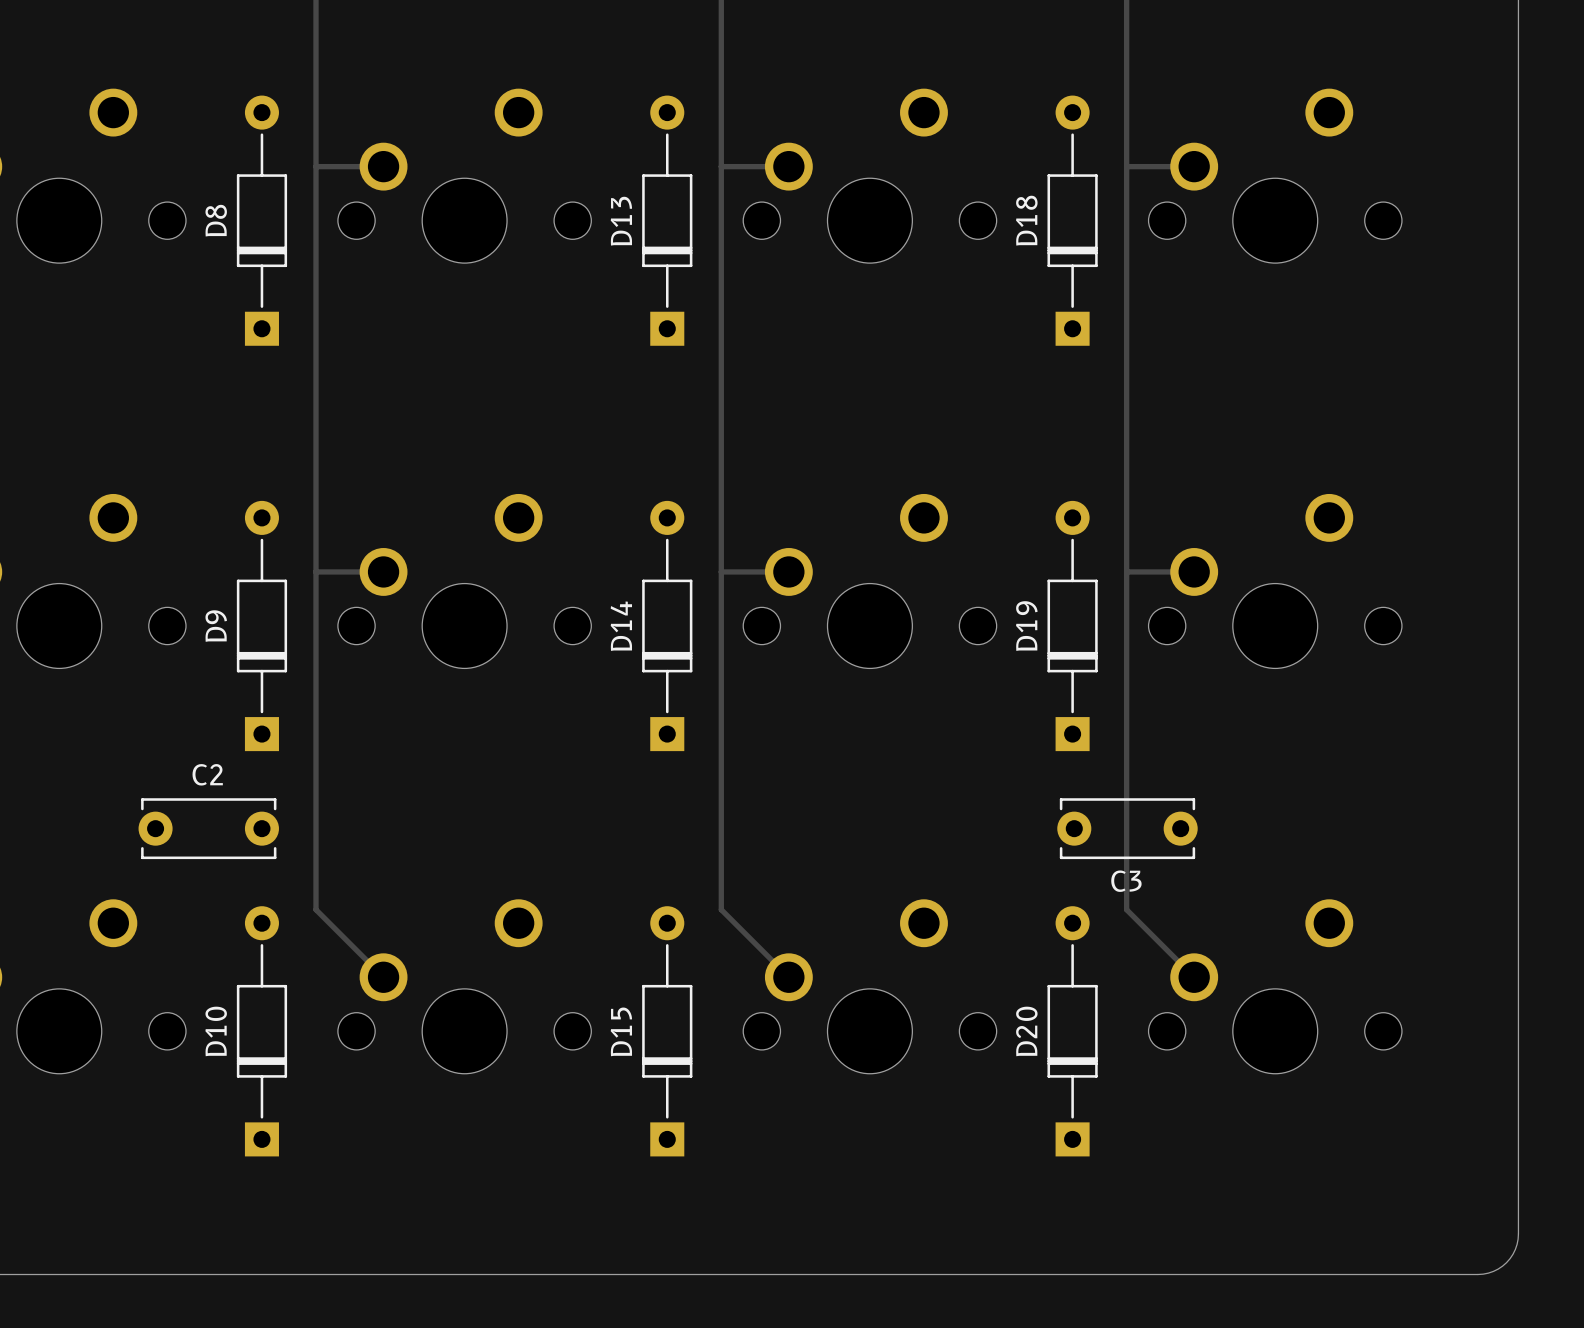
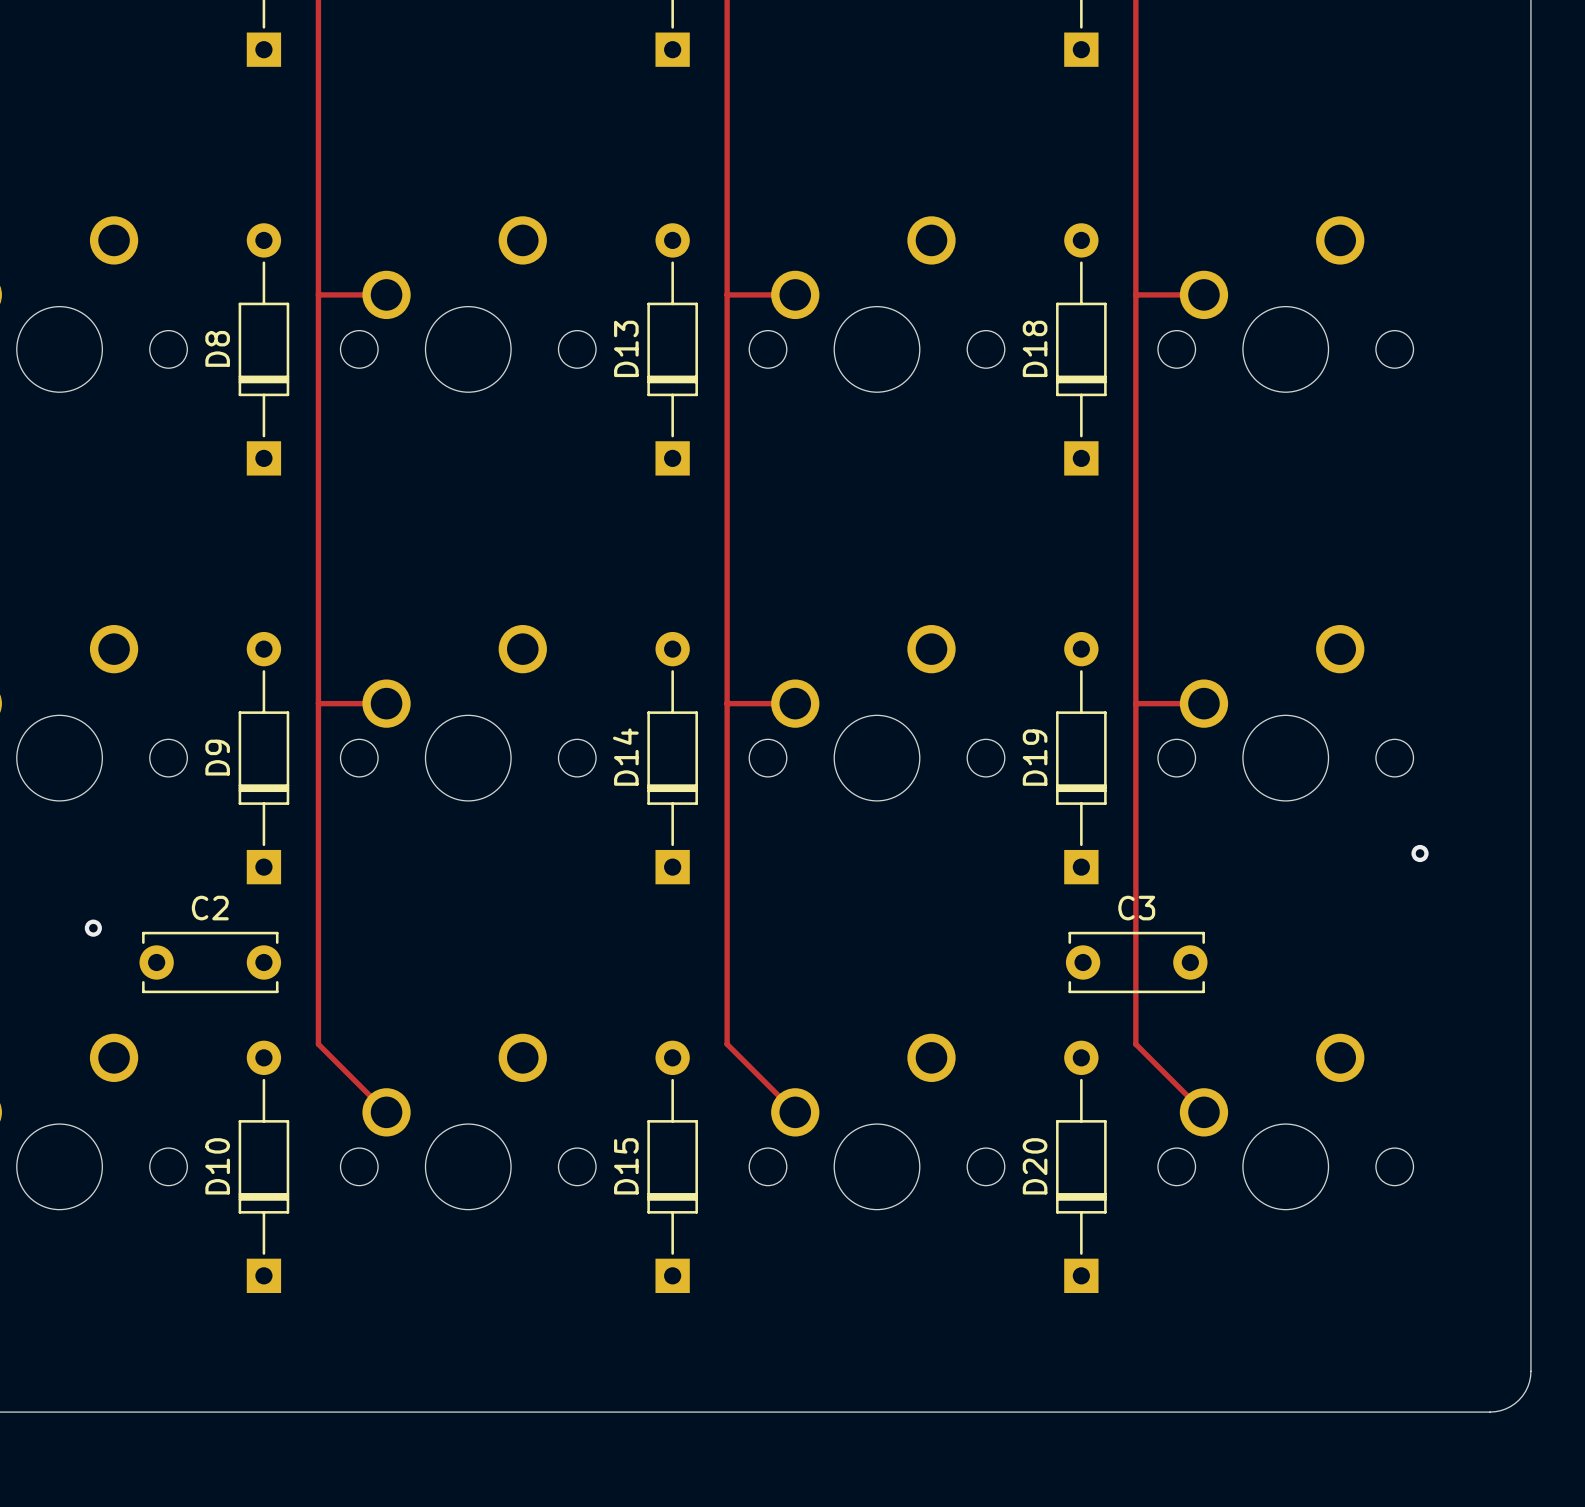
via: none -> (1420, 853)
via: none -> (93, 928)
C3 name position: C3 (1126, 881) -> C3 (1136, 908)

